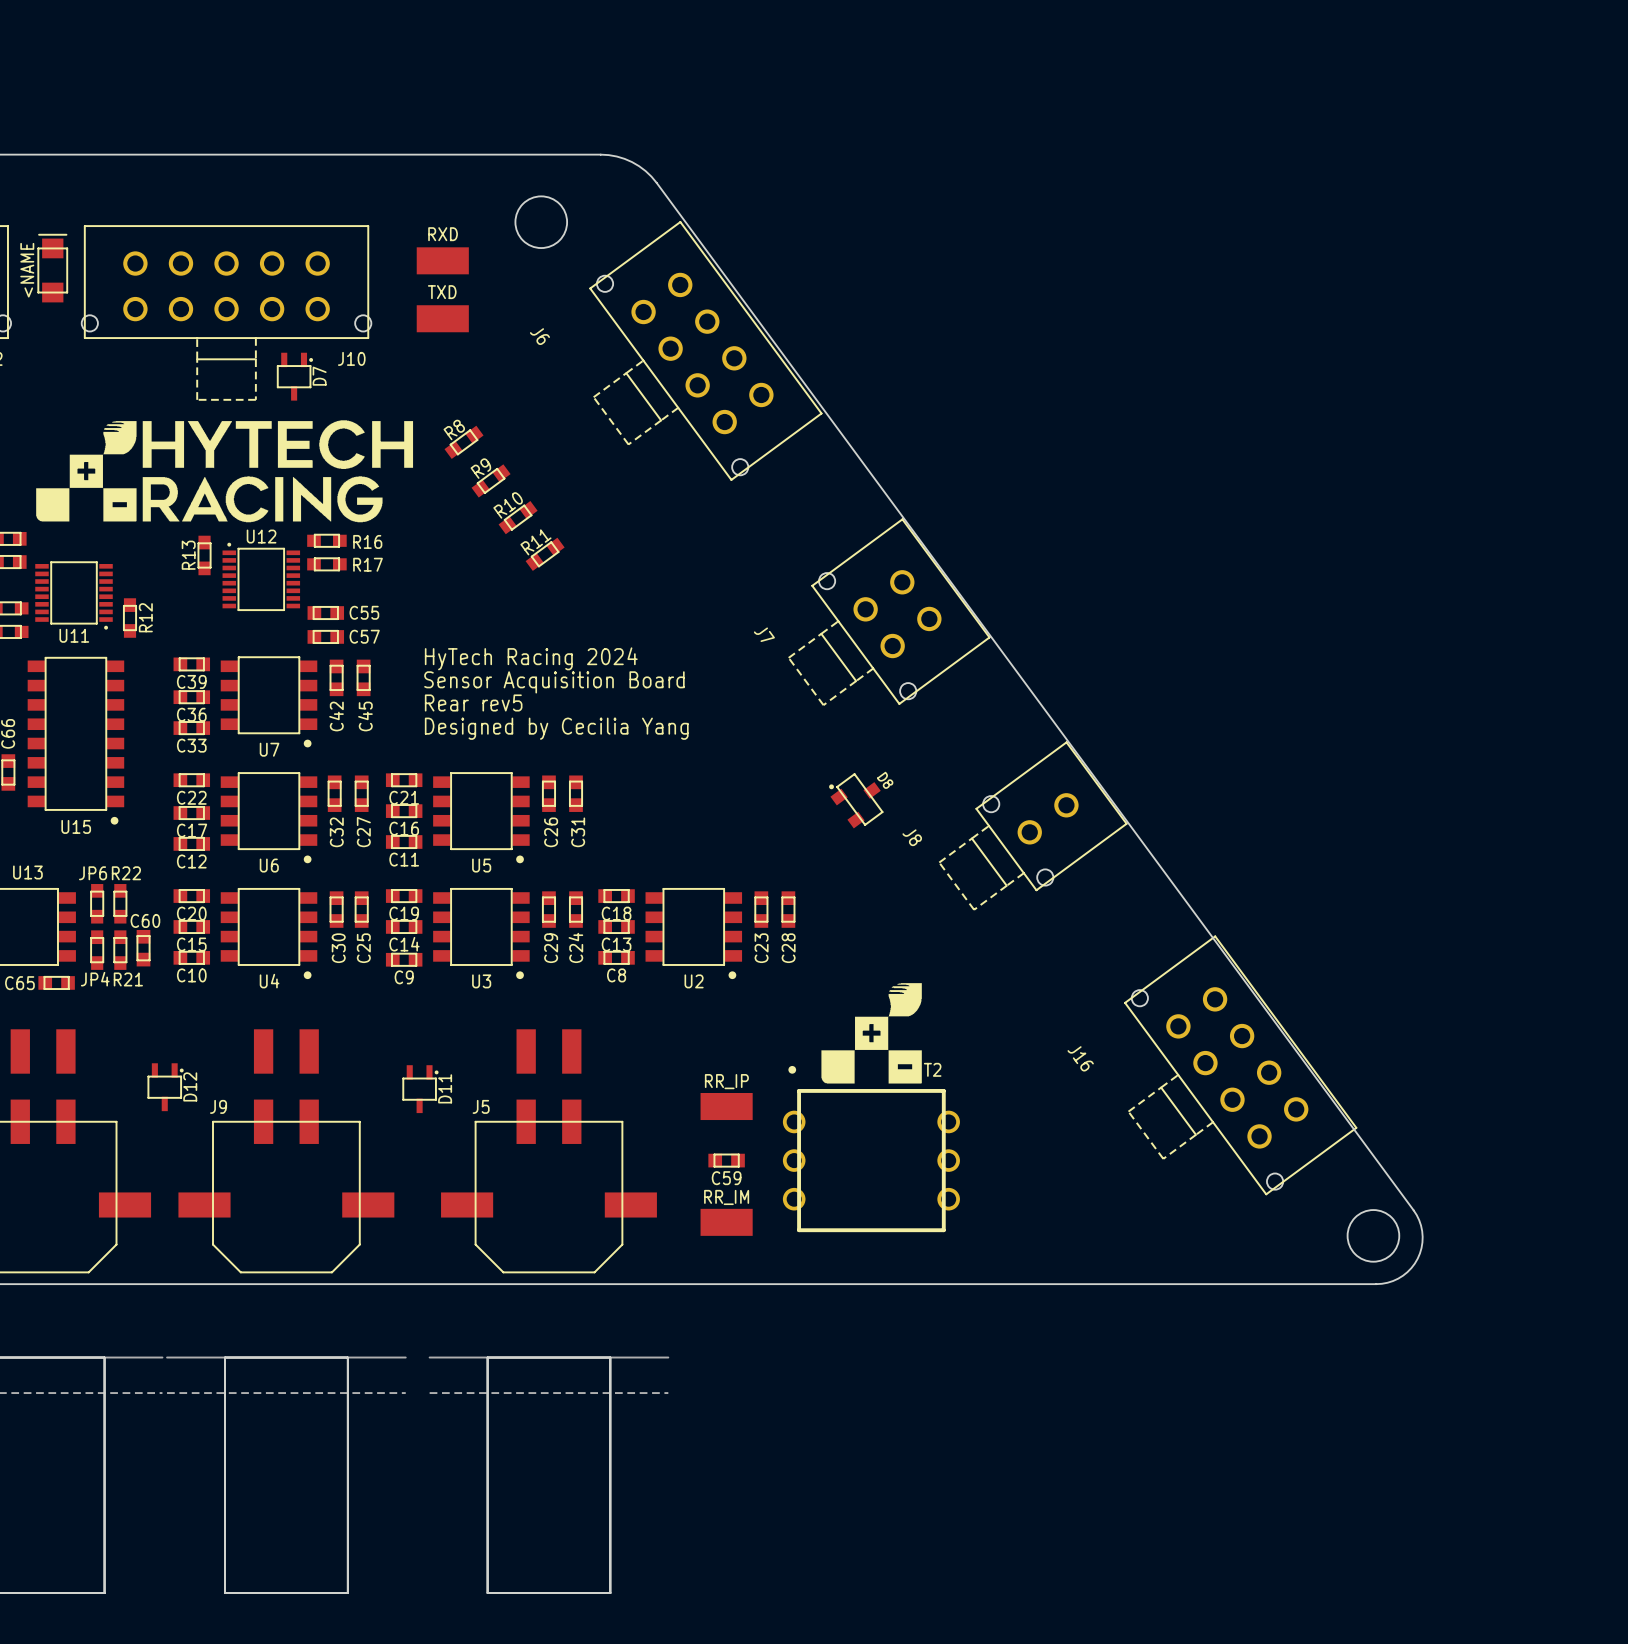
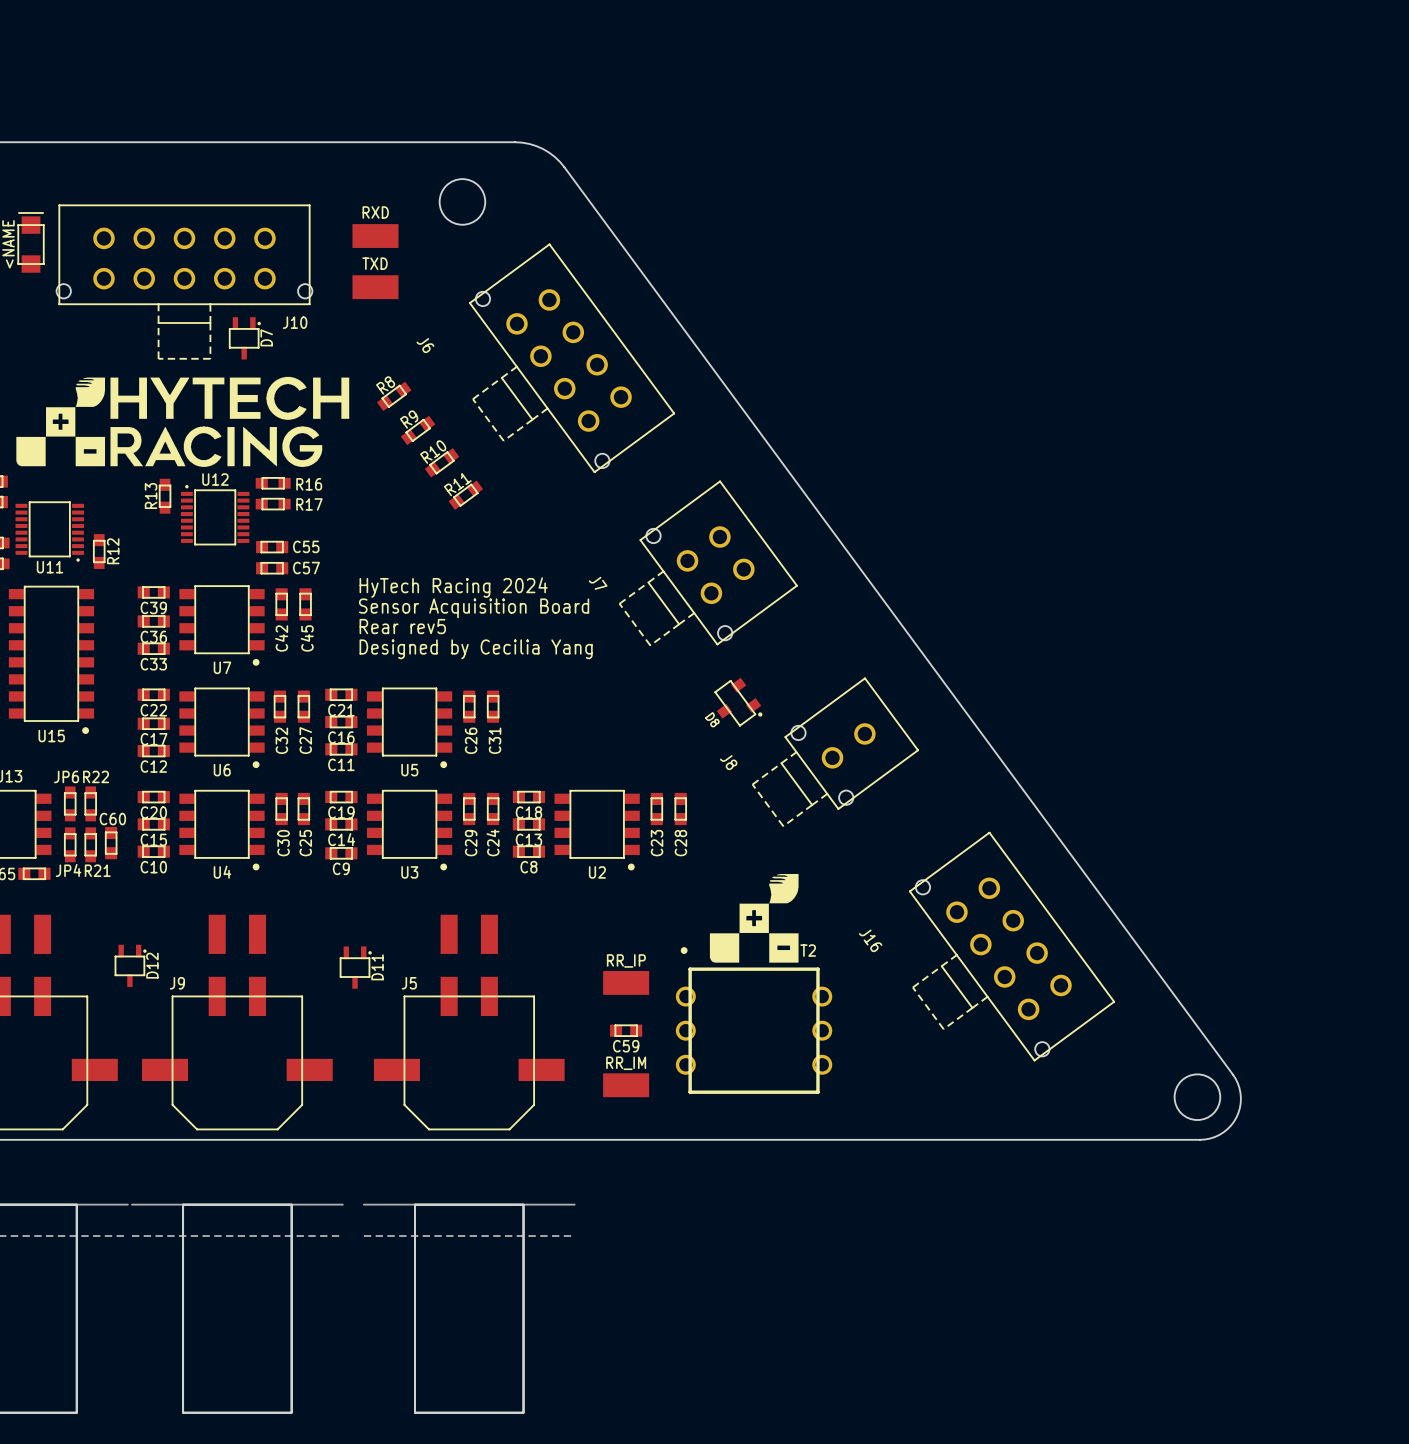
J6 position: (705, 350) -> (572, 358)
J7 position: (889, 612) -> (708, 563)
D8 rotation: 0° (856, 800) -> 180° (738, 702)
J8 position: (1032, 826) -> (835, 752)
J16 position: (1240, 1065) -> (1012, 946)

